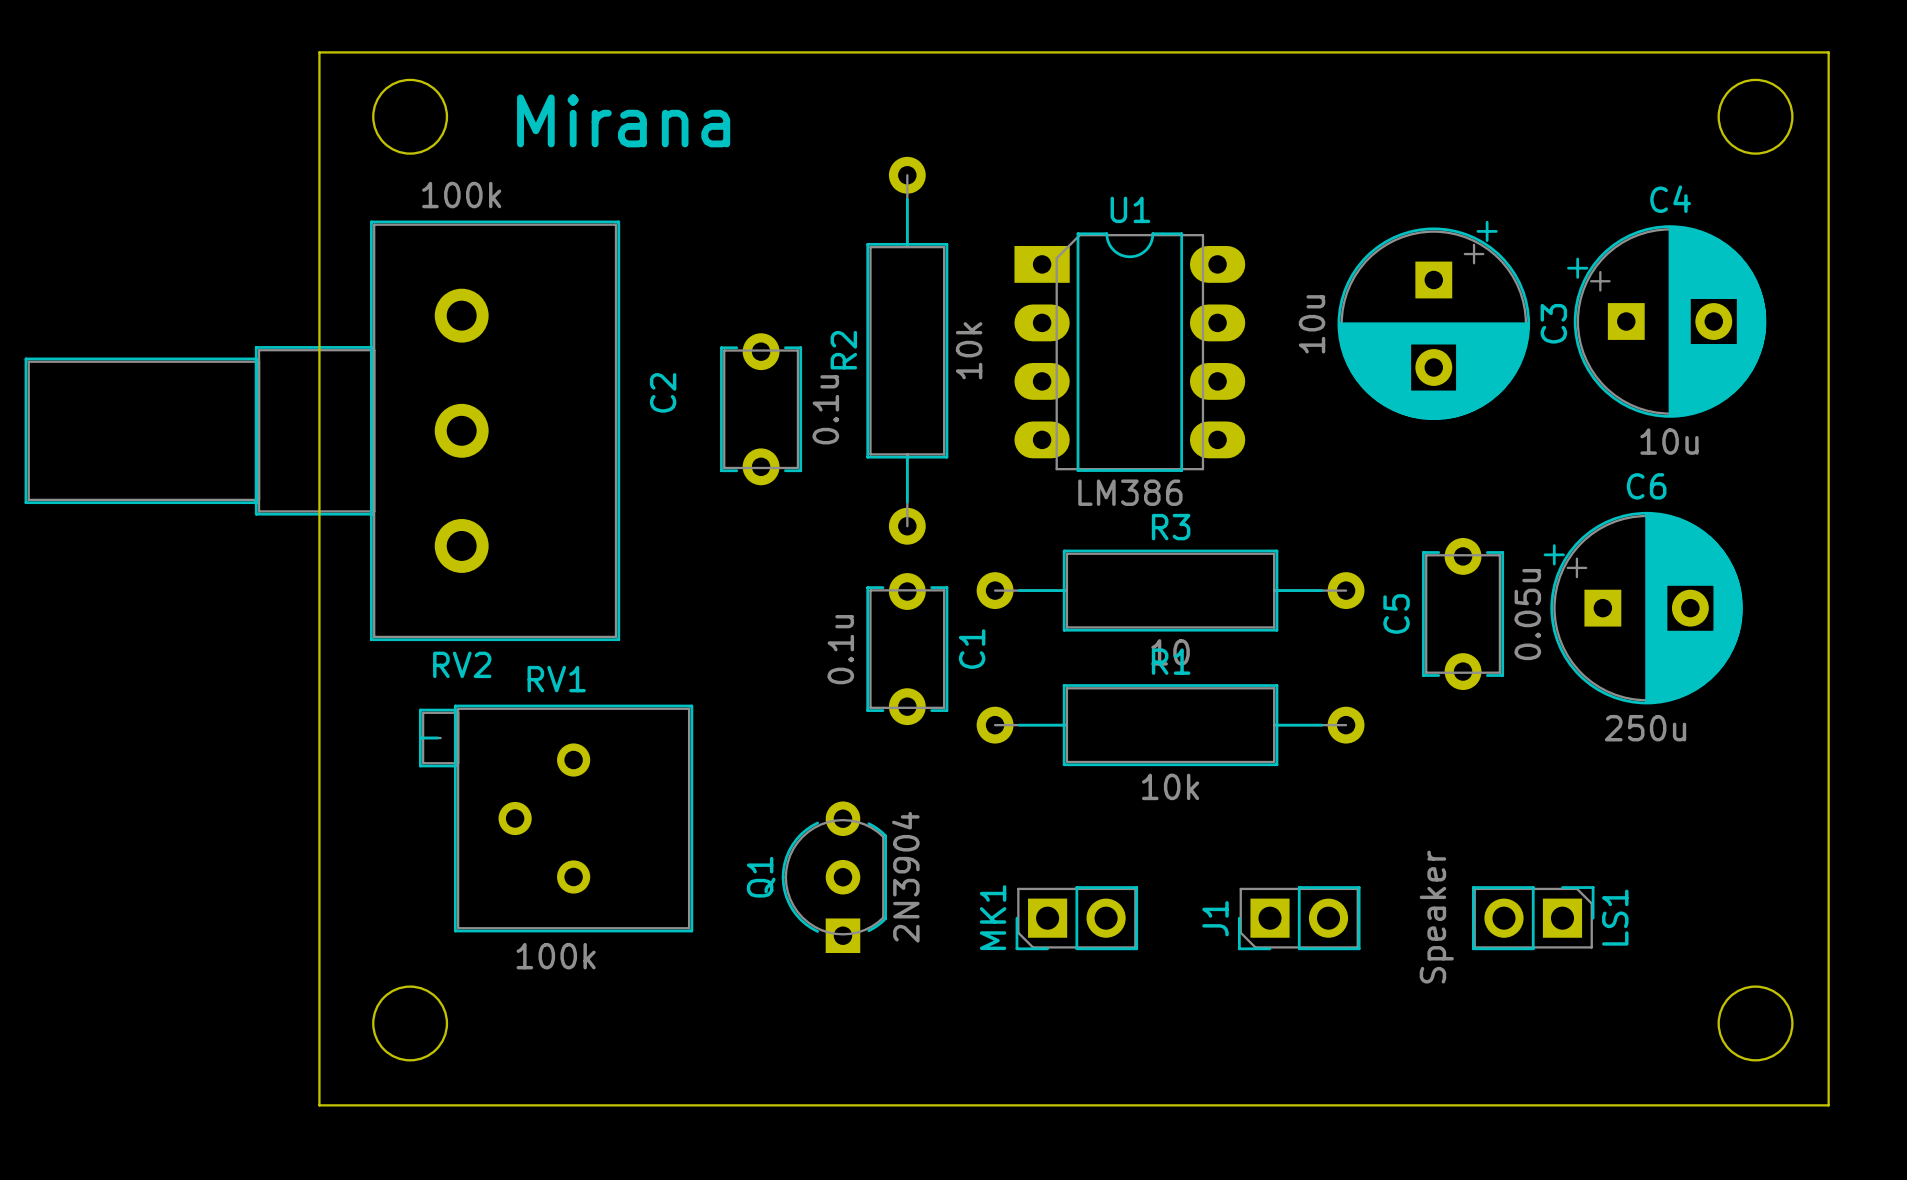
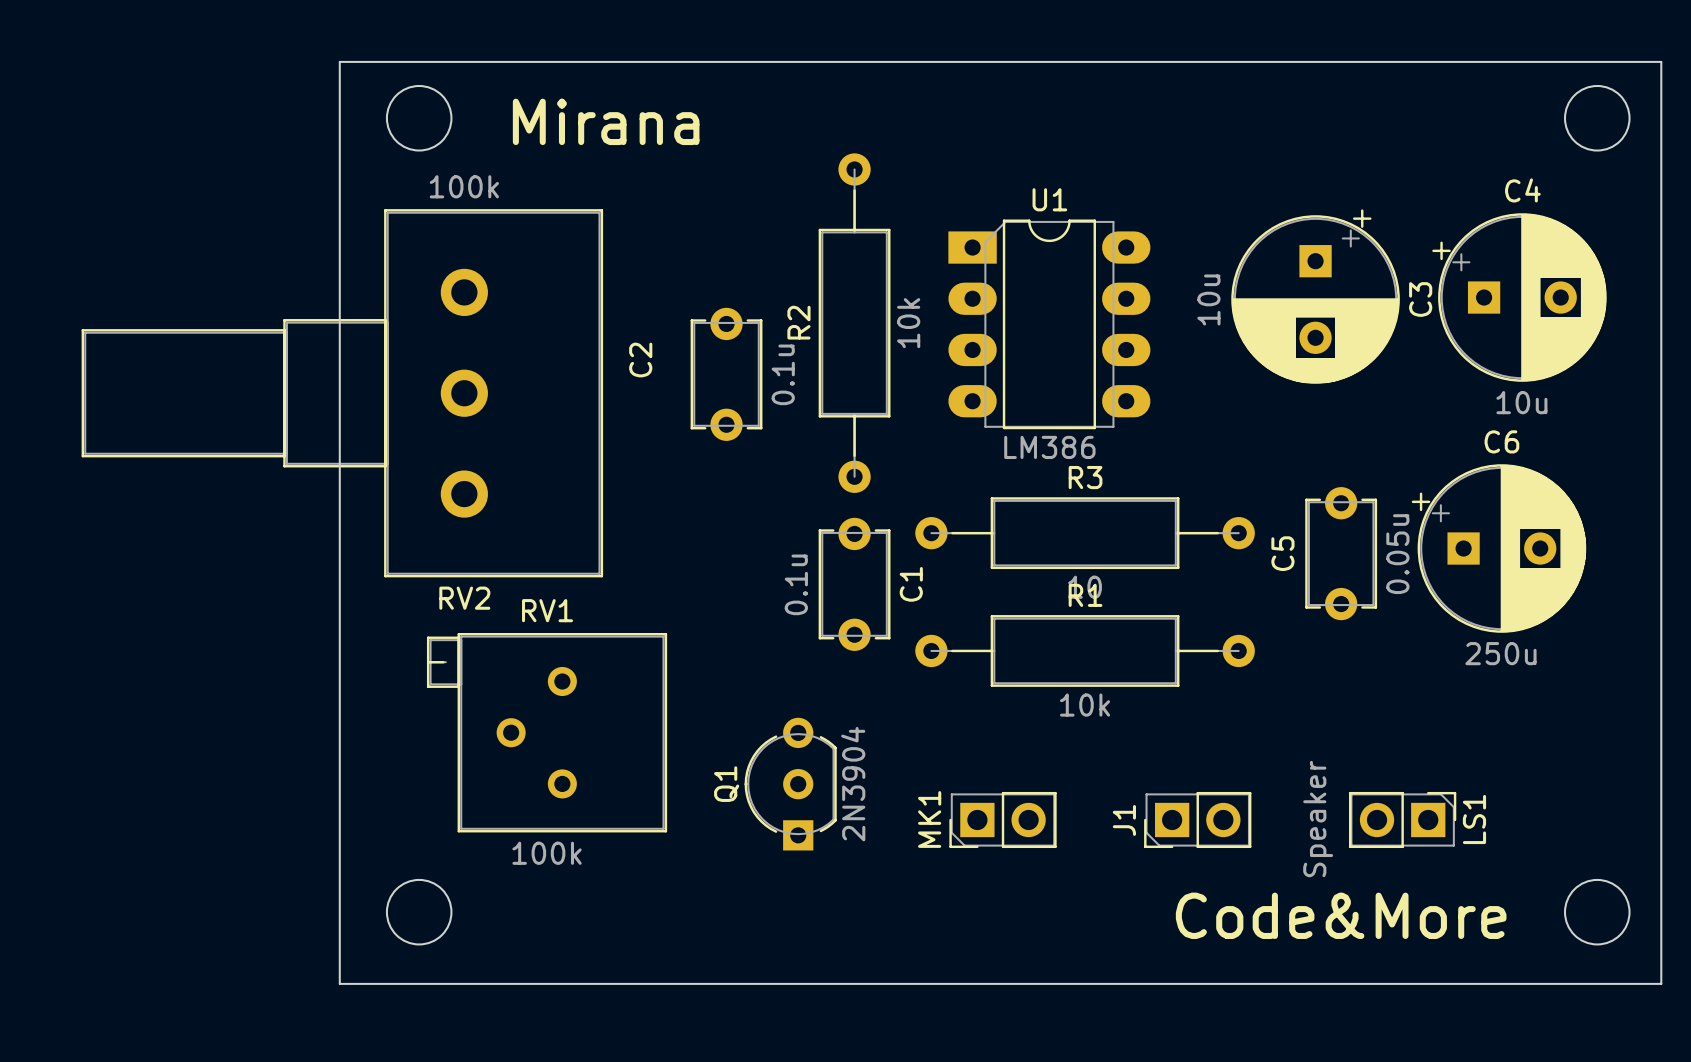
text: none -> Code&More (1341, 915)

